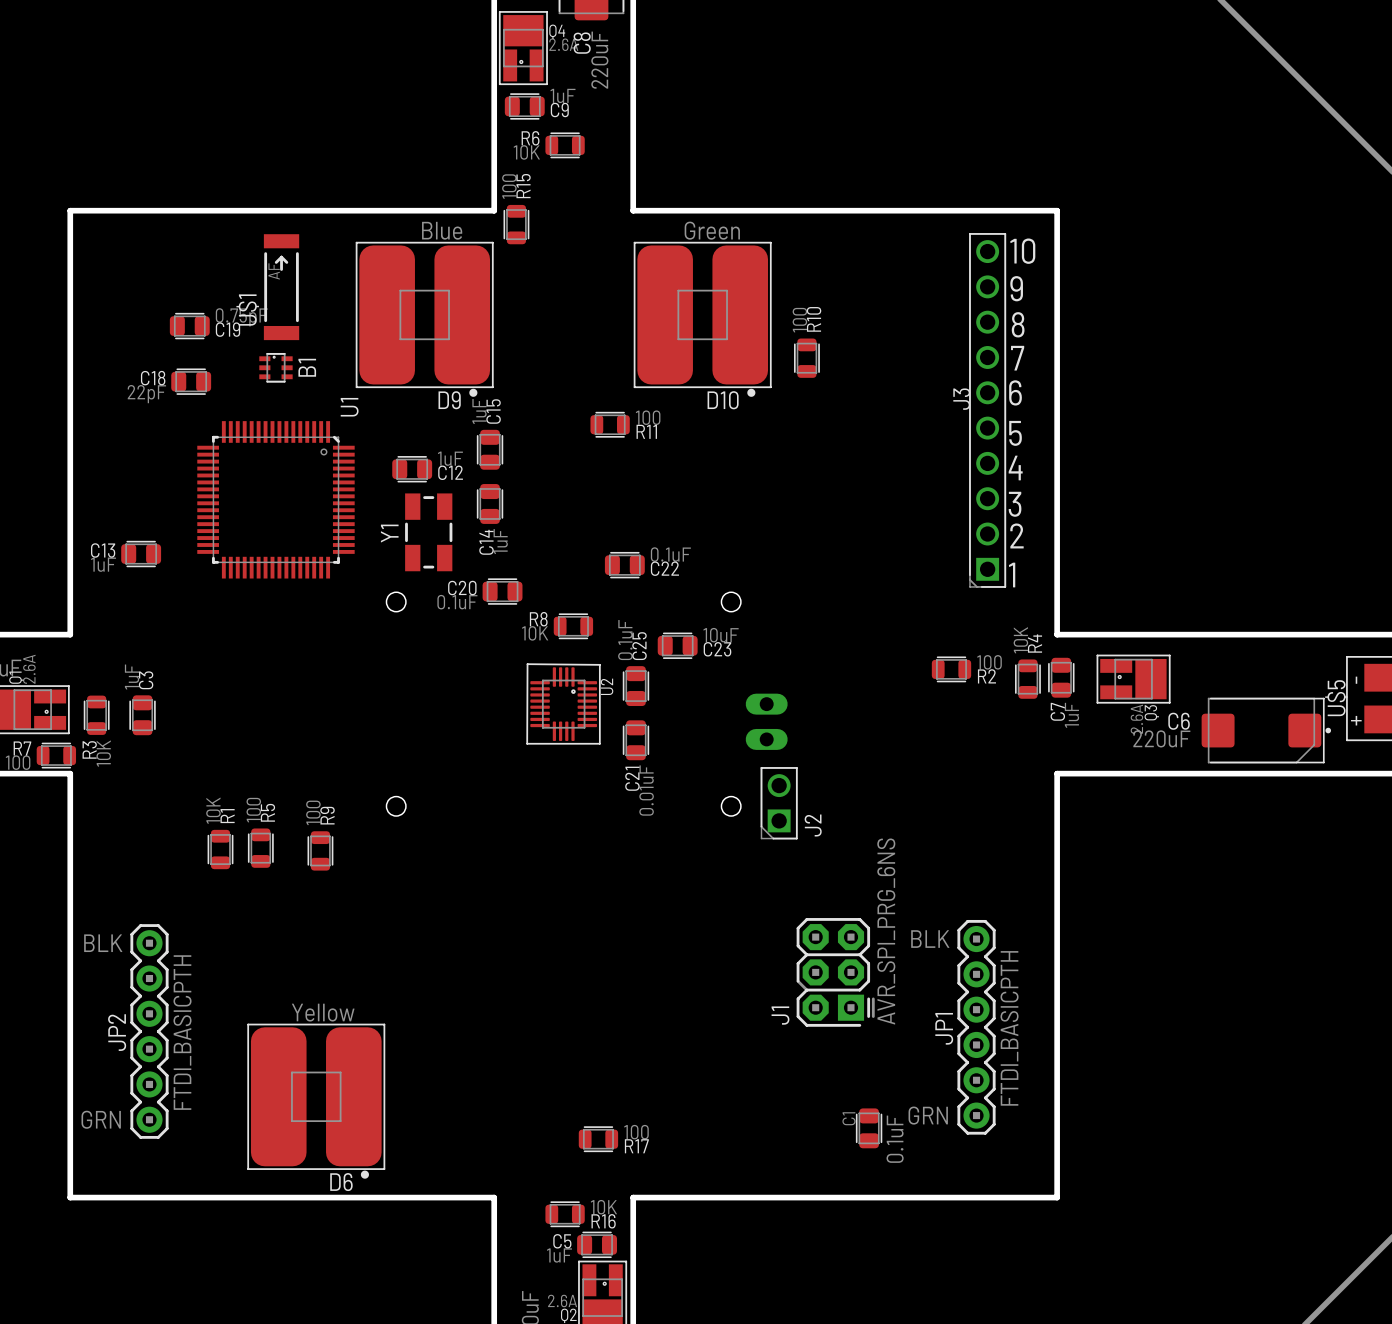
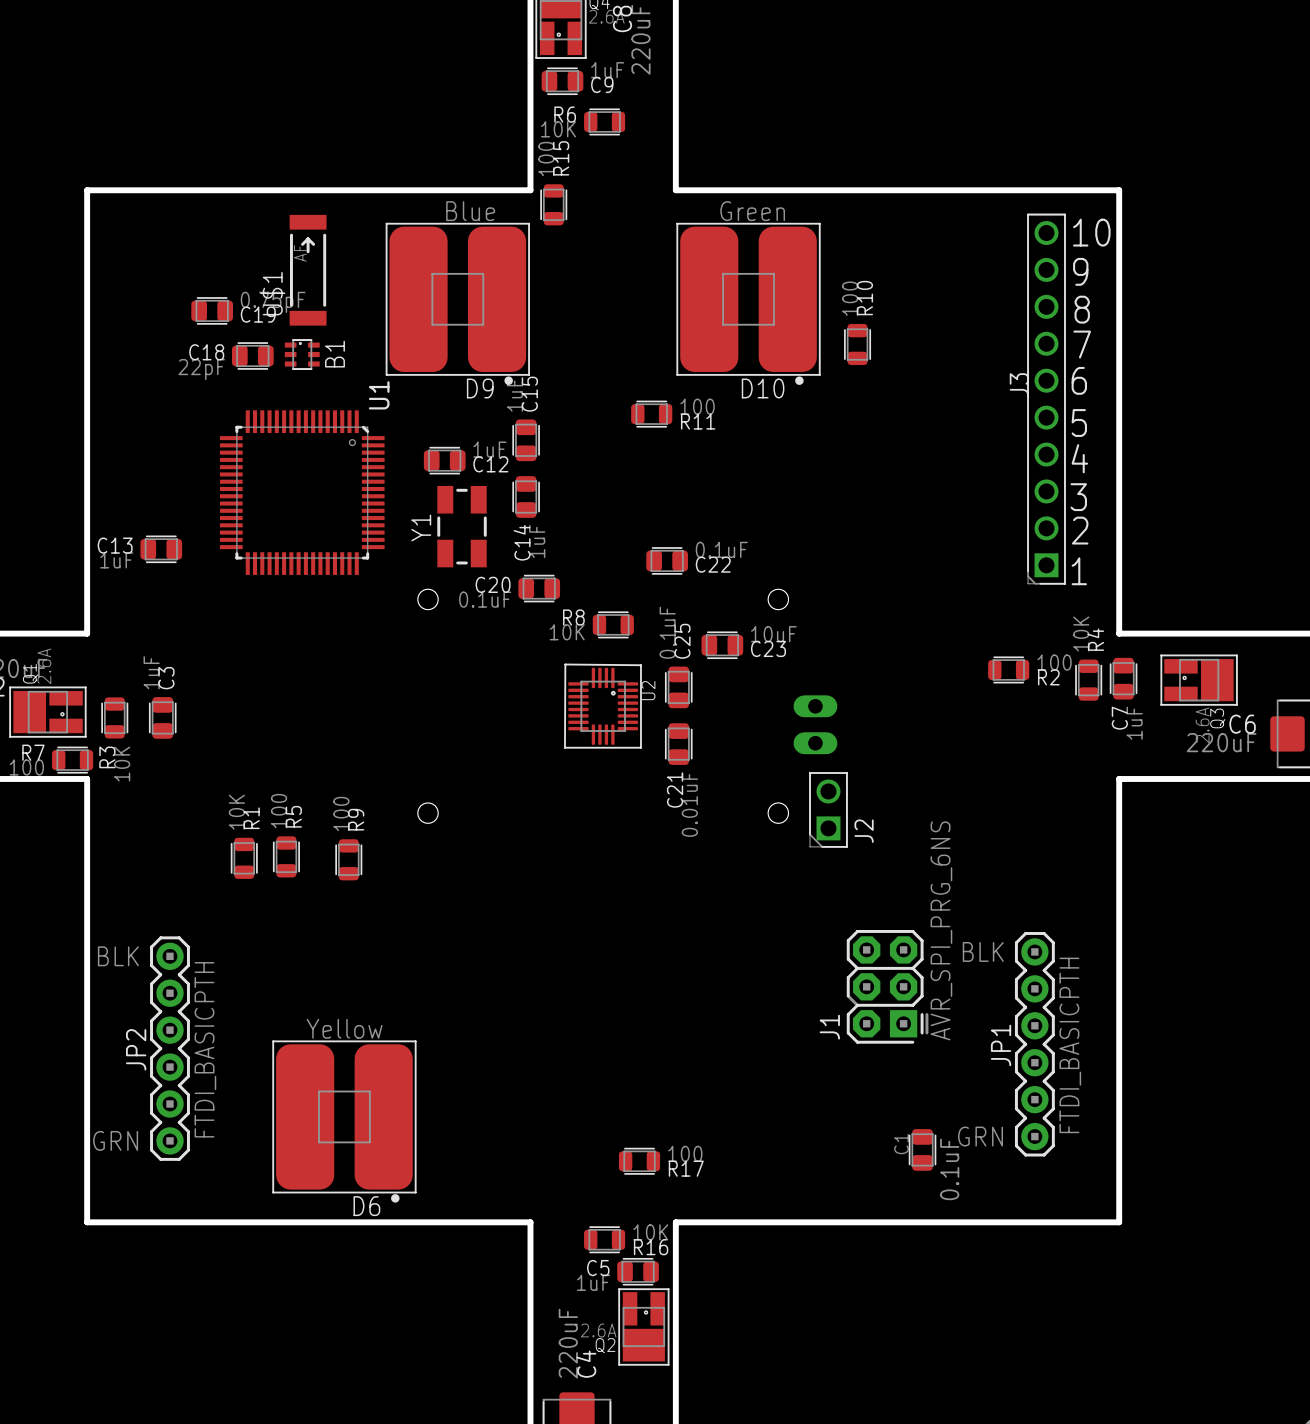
C18 position: (191, 381) -> (252, 355)

